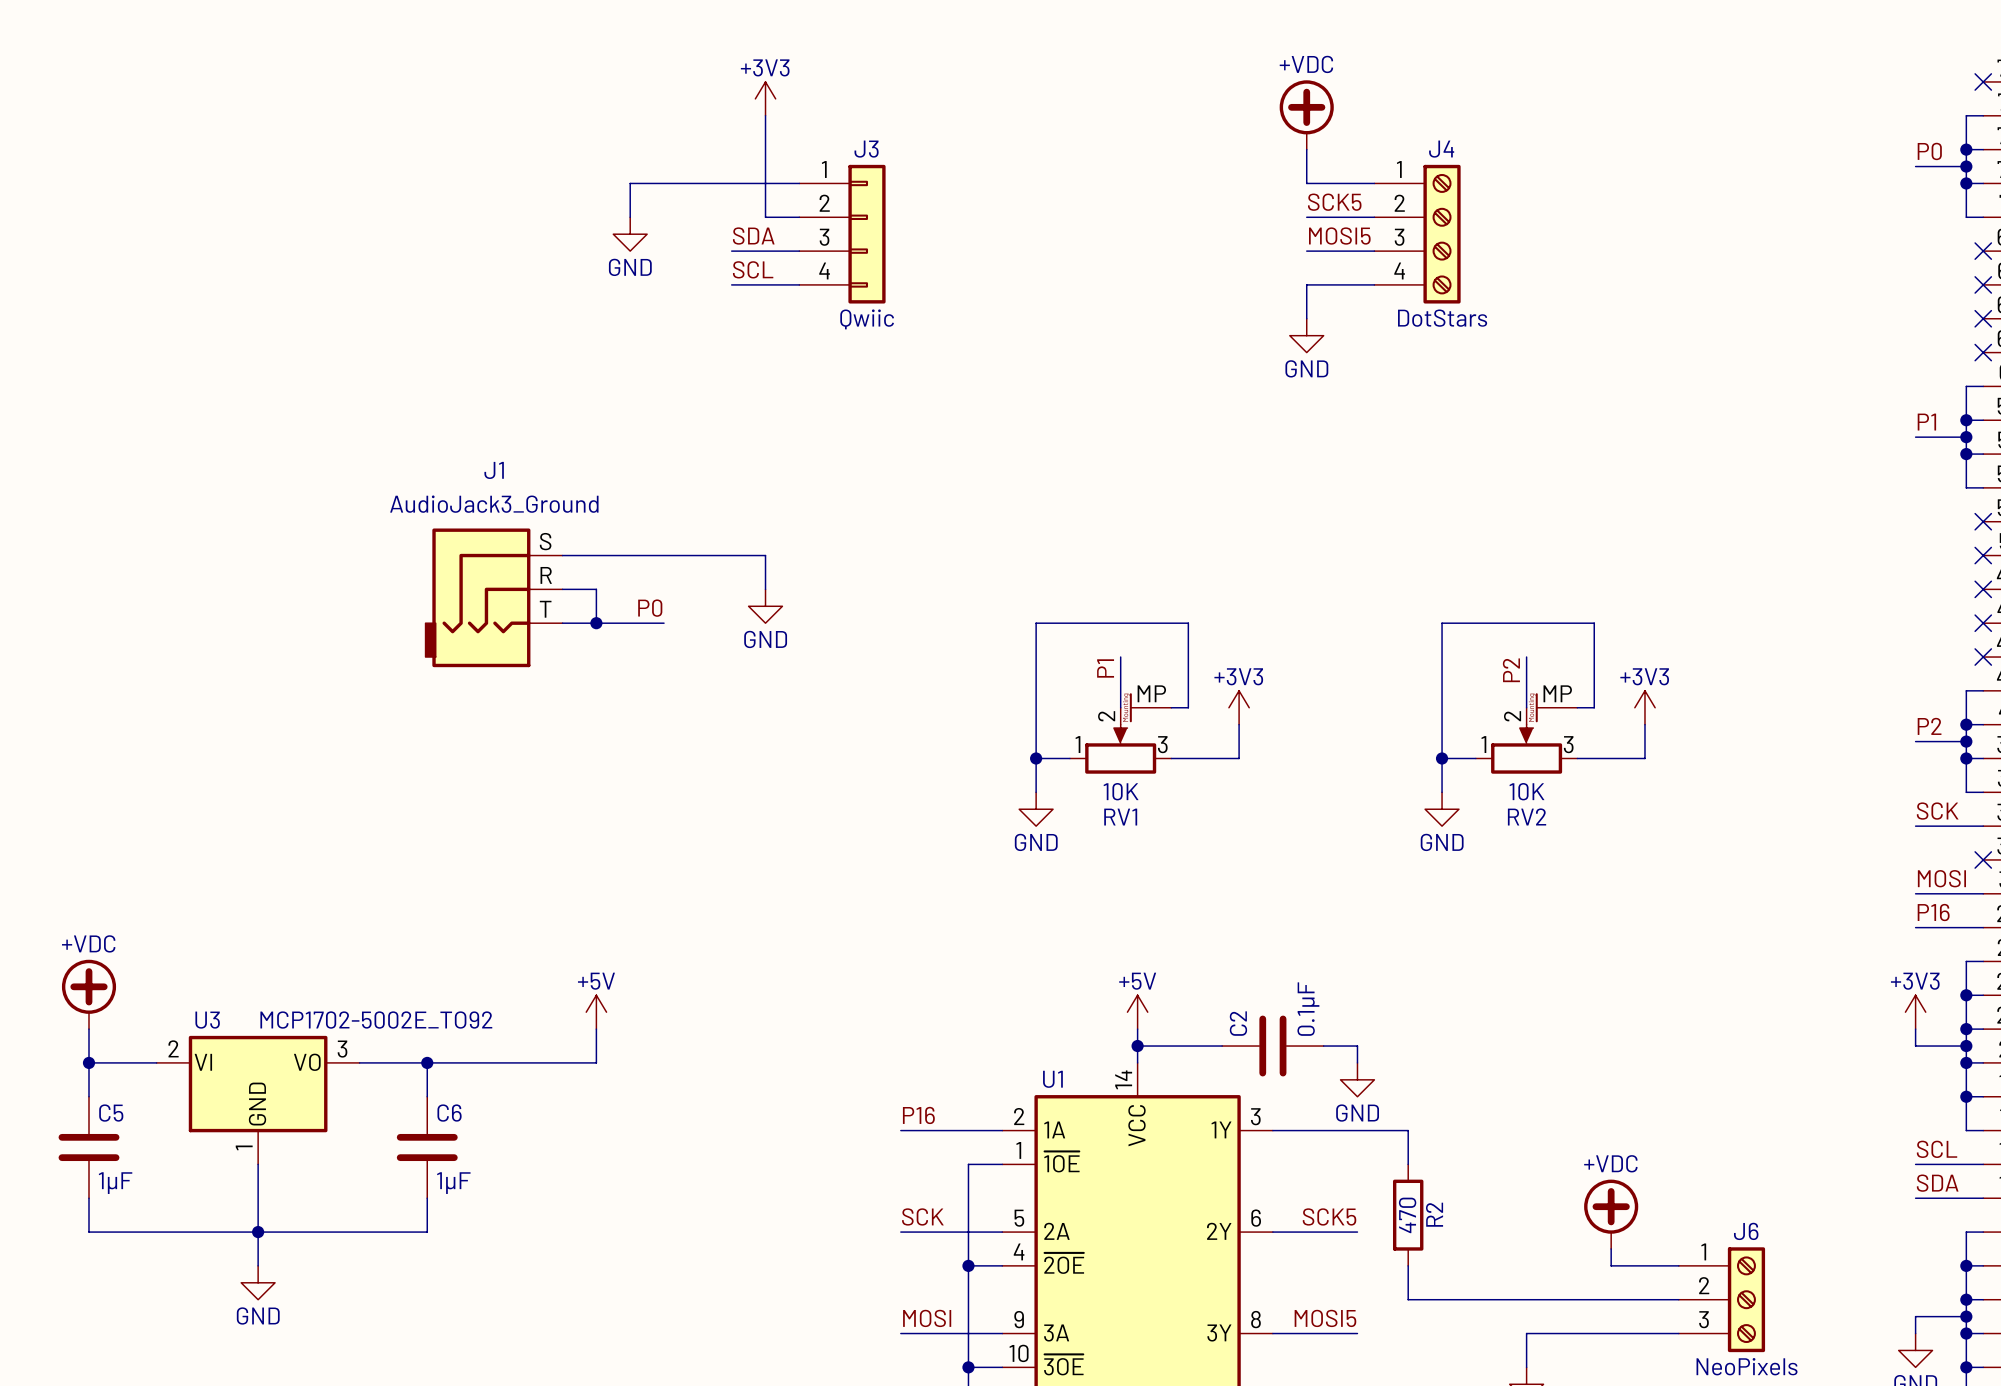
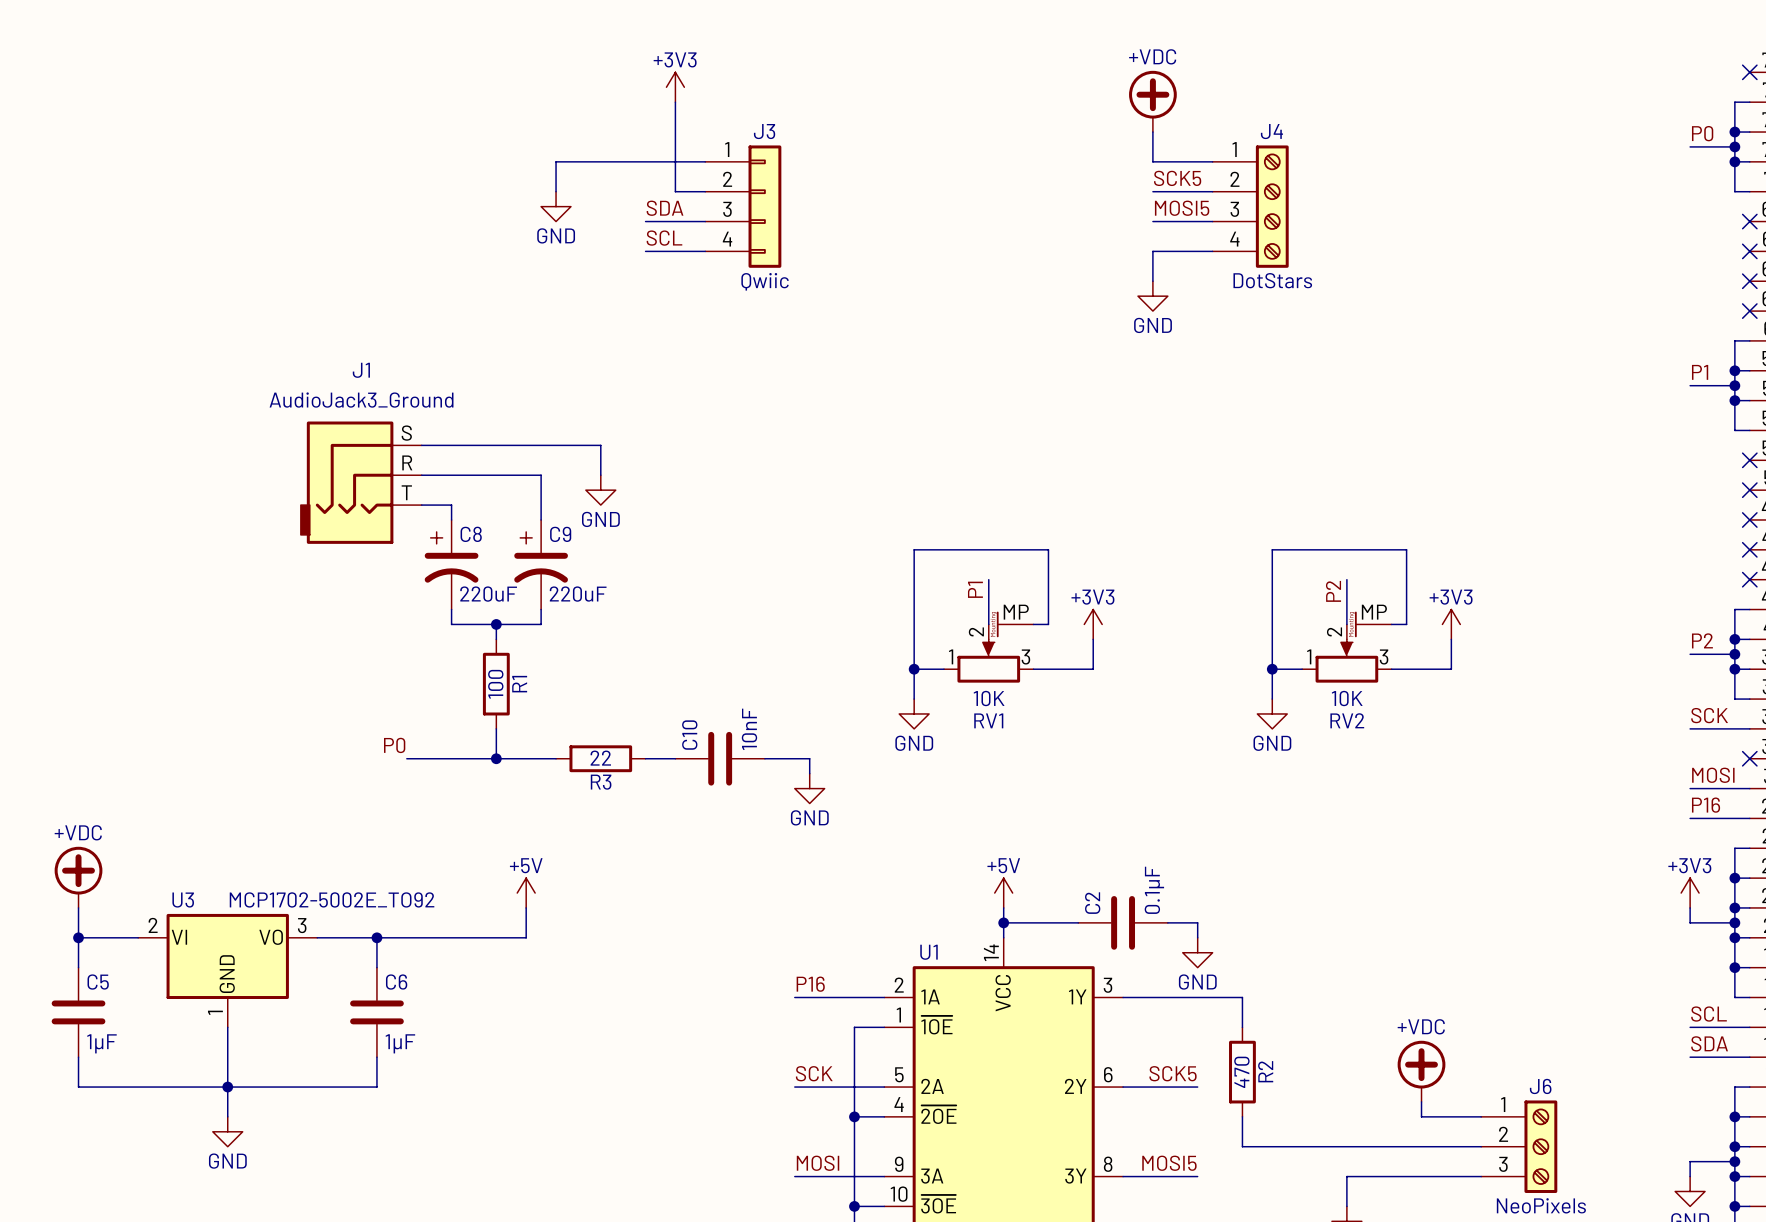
wire: none -> (421, 475) (541, 475) (541, 519)
wire: (562, 555) (765, 555) (765, 589) -> (421, 445) (600, 445) (600, 475)
wire: (562, 589) (596, 589) (596, 623) -> none
J1 position: (494, 597) -> (361, 482)
power symbol position: GND (765, 606) -> GND (600, 490)
label position: P0 (650, 608) -> P0 (394, 745)
wire: (562, 623) (664, 623) -> none
junction: (596, 623) -> none
C8: none -> 220uF (451, 564)
C9: none -> 220uF (541, 564)
wire: none -> (451, 609) (451, 624) (541, 624) (541, 609)
wire: none -> (496, 624) (496, 639)
junction: none -> (496, 624)
R1: none -> 100 (496, 684)
wire: none -> (496, 728) (496, 758)
wire: none -> (406, 758) (556, 758)
junction: none -> (496, 758)
R3: none -> 22 (600, 758)
wire: none -> (645, 758) (675, 758)
C10: none -> 10nF (720, 758)
wire: none -> (764, 758) (809, 758) (809, 773)
power symbol: none -> GND (809, 788)

